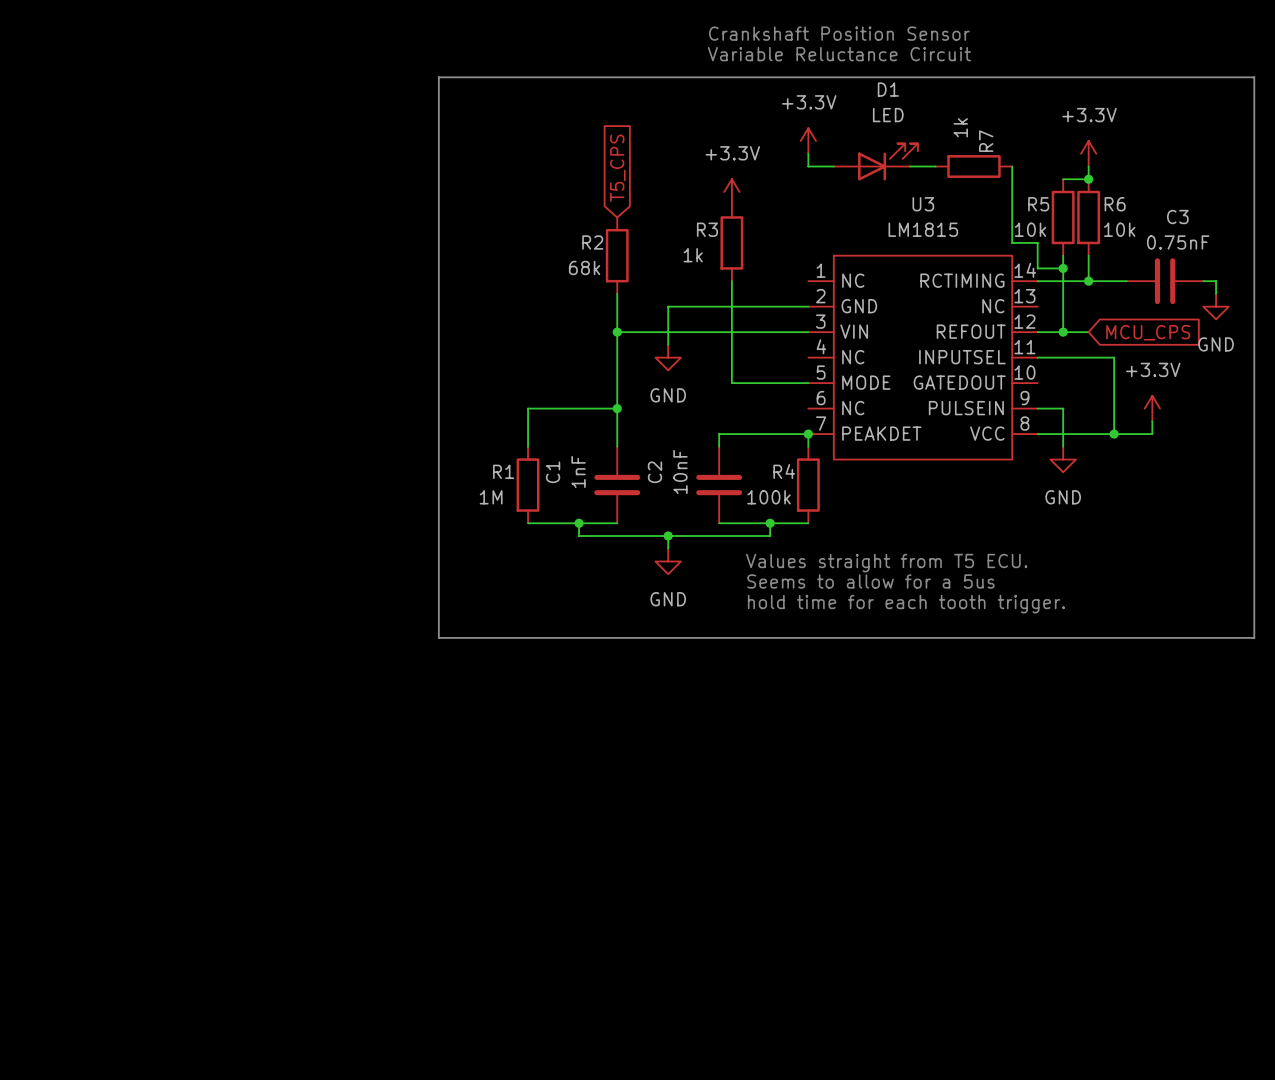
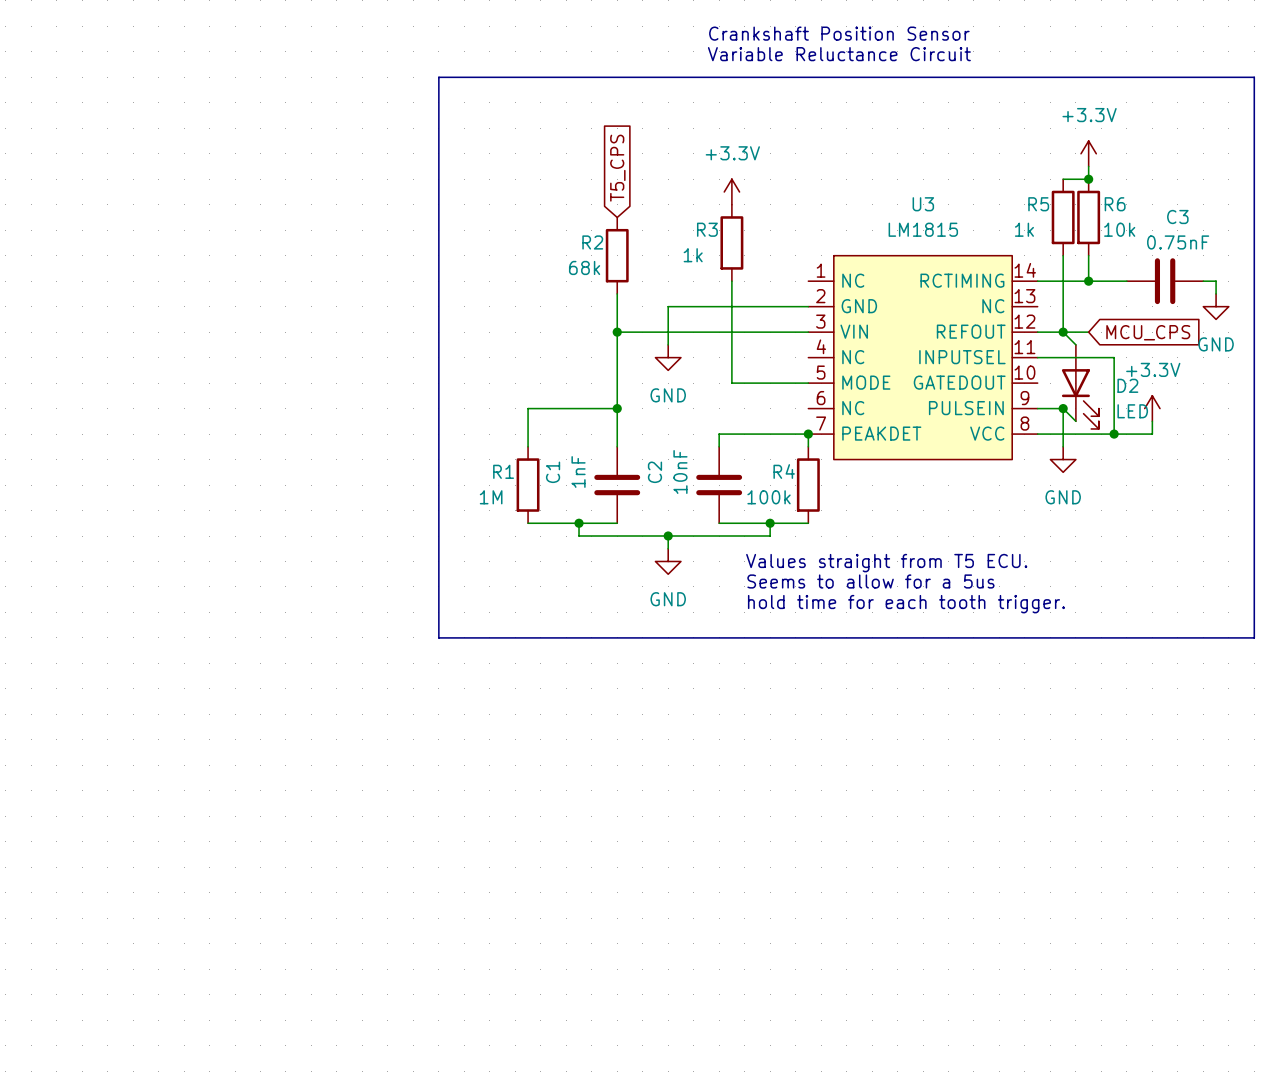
power symbol: +3.3V (808, 141) -> none
wire: (808, 153) (808, 166) (833, 166) -> none
D1: LED (875, 162) -> none
wire: (910, 166) (935, 166) -> none
R7: 1k (973, 166) -> none
wire: (1012, 166) (1012, 242) (1037, 242) (1037, 268) (1063, 268) -> none
R5 value: 10k (1030, 229) -> 1k (1024, 229)
junction: (1063, 268) -> none
wire: none -> (1063, 332) (1075, 344)
D2: none -> LED (1080, 386)
wire: none -> (1063, 408) (1075, 421)
junction: none -> (1063, 408)

